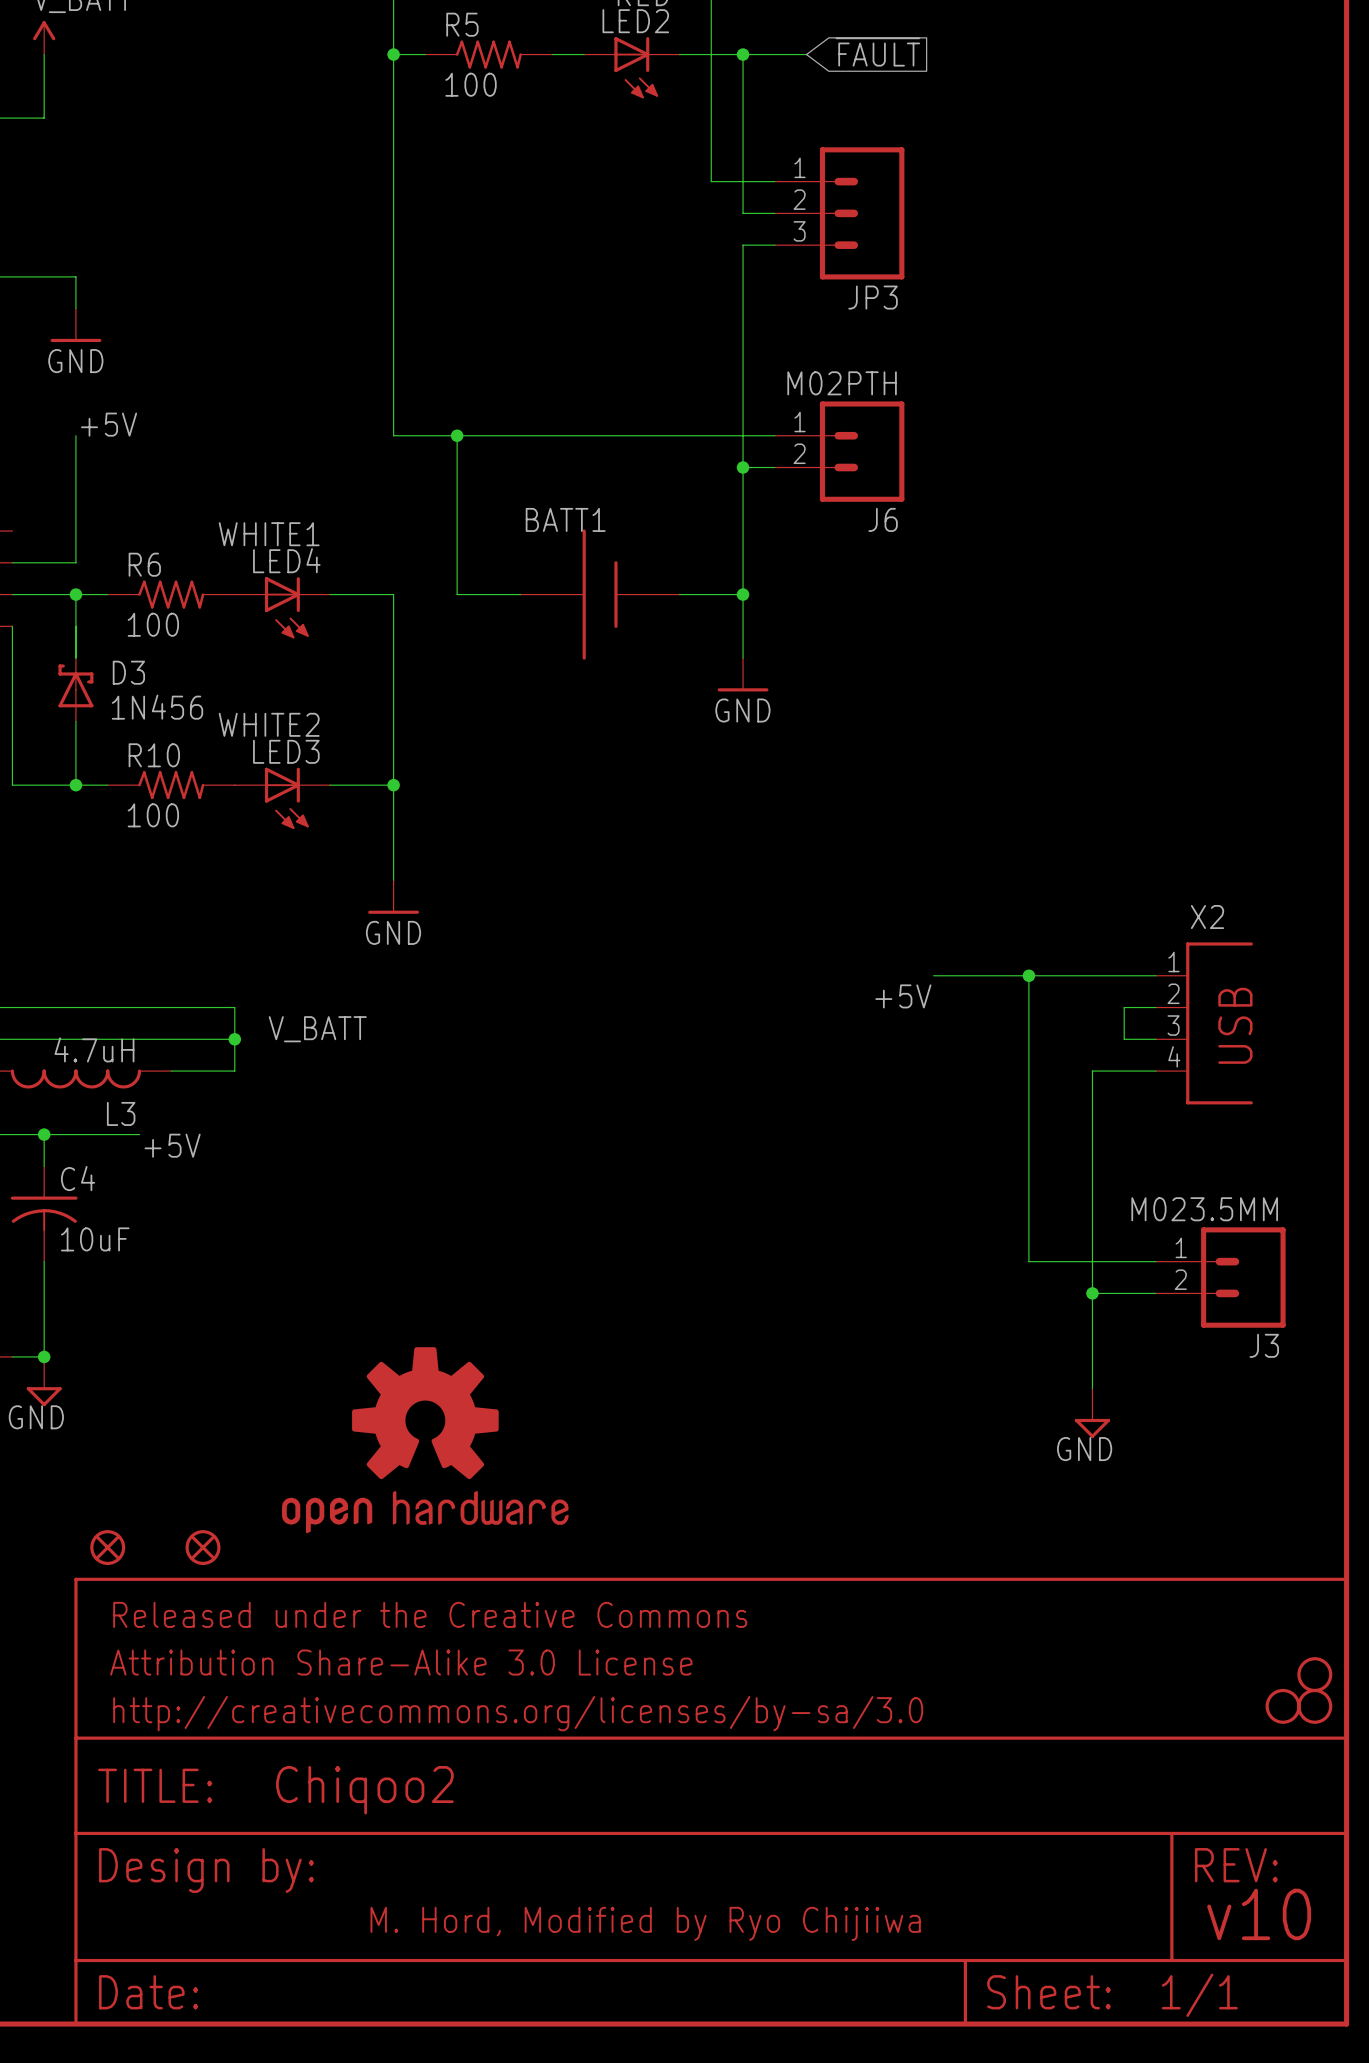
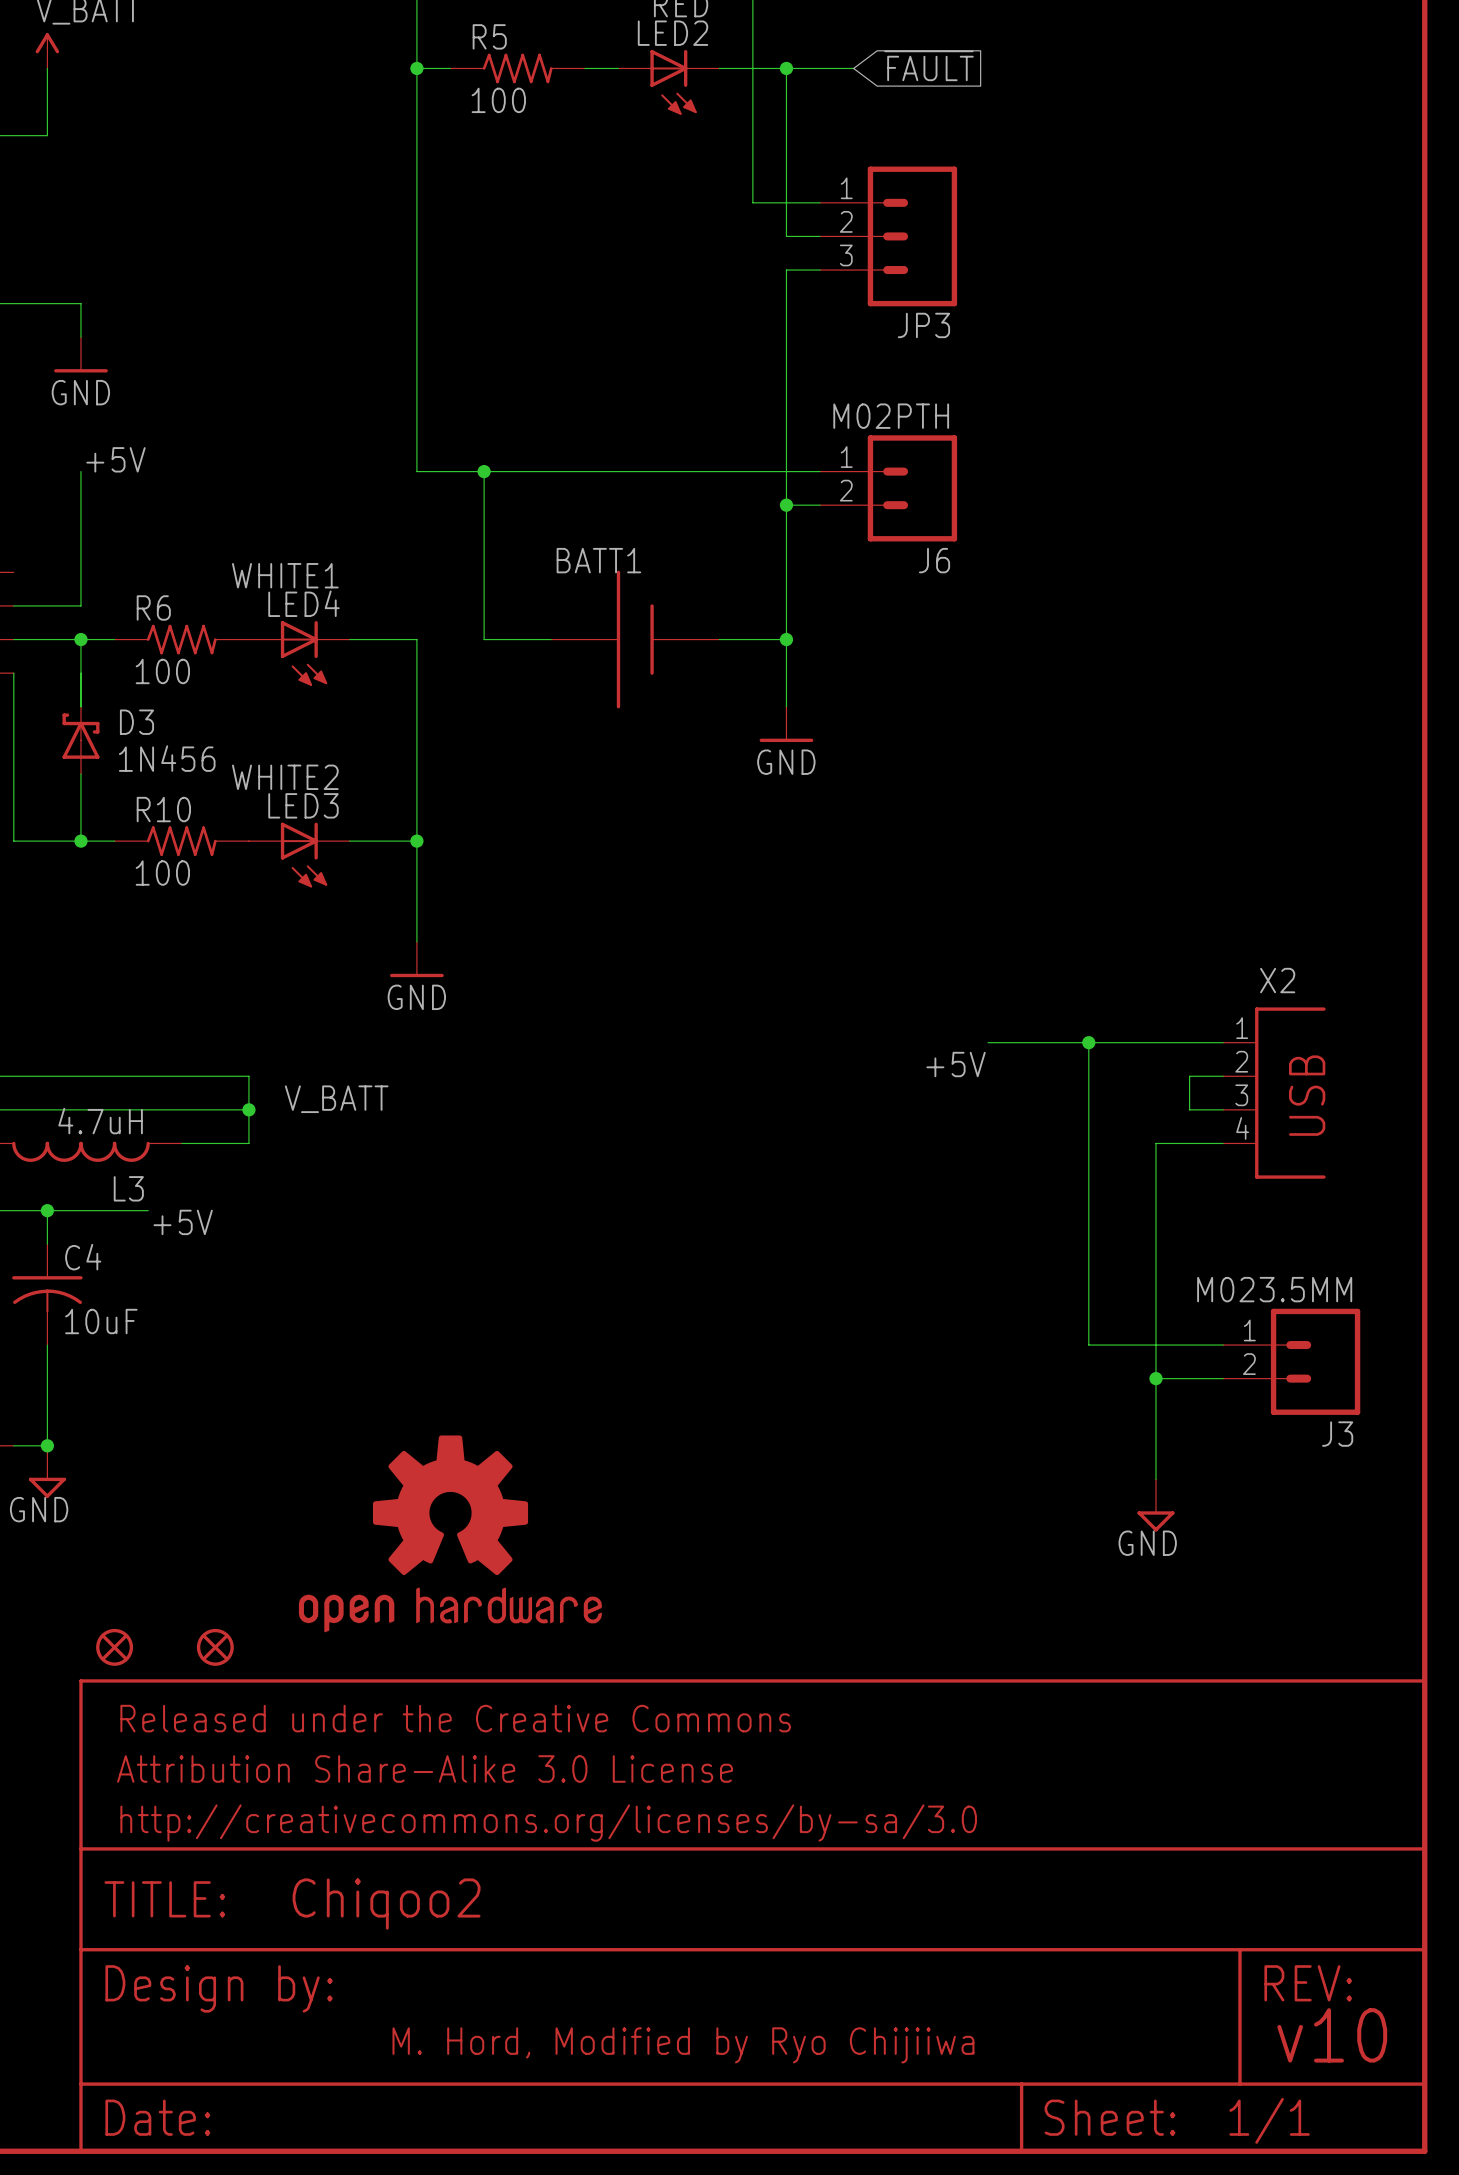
part: (1314, 1674) -> none
part: (1283, 1706) -> none
part: (1314, 1706) -> none

